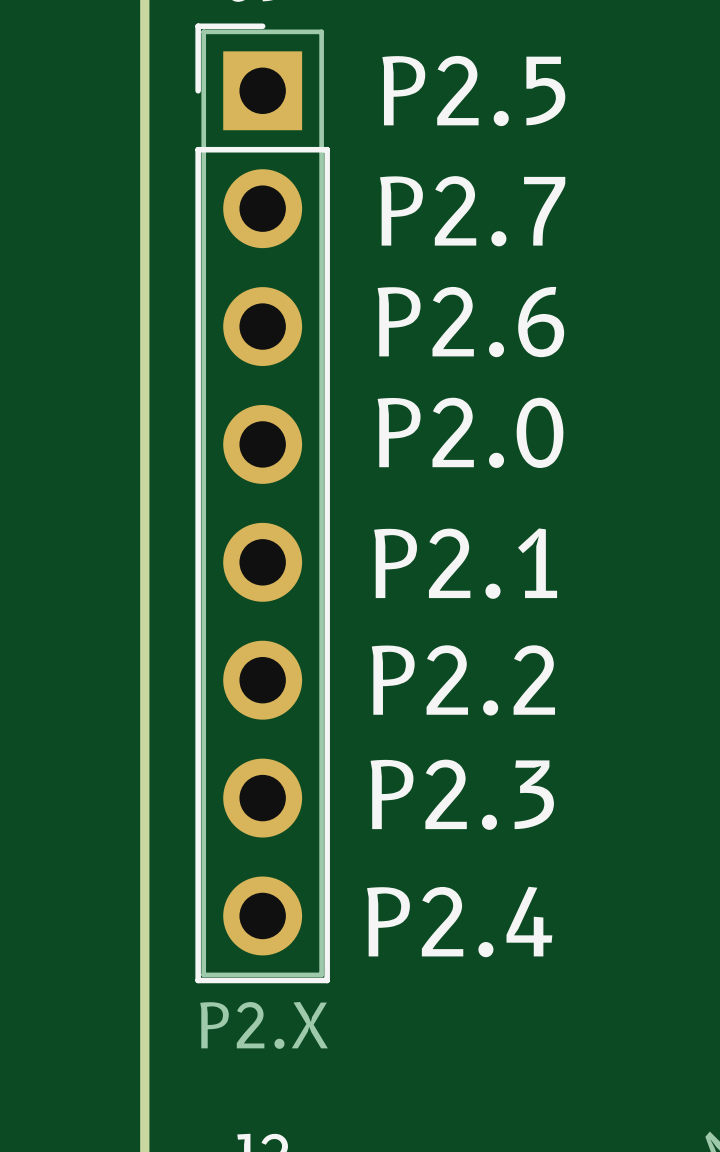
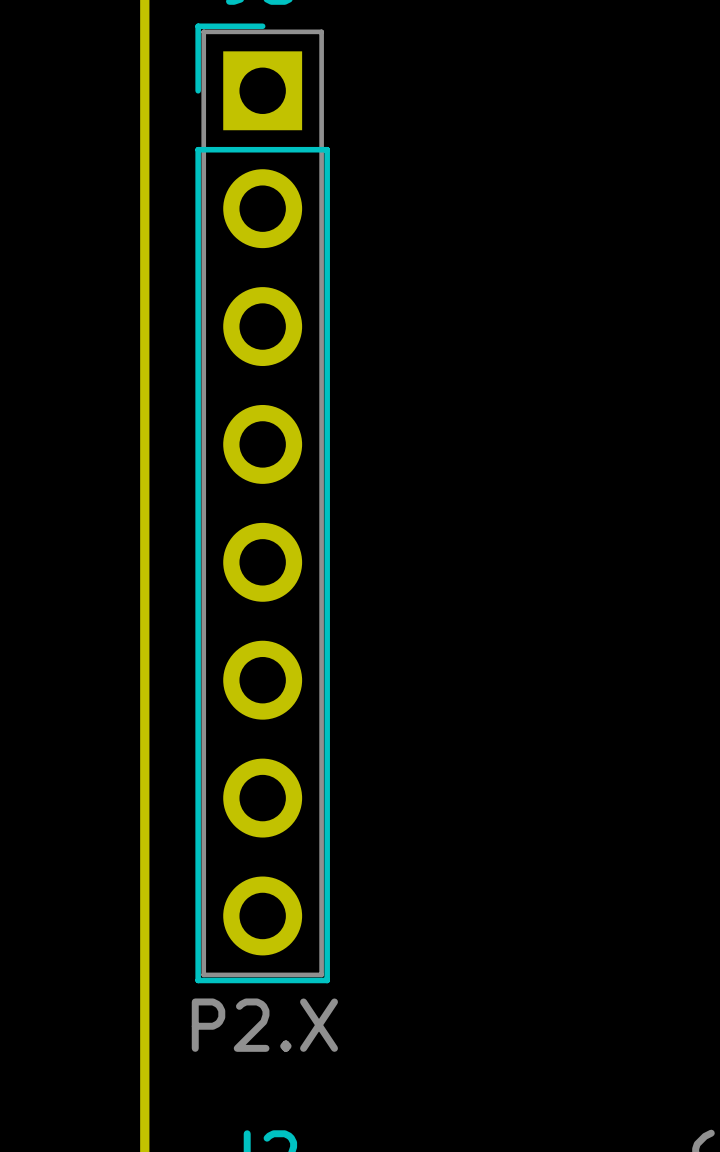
text: P2.5 (473, 91) -> none
text: P2.7 (472, 211) -> none
text: P2.6 (470, 322) -> none
text: P2.0 (470, 432) -> none
text: P2.1 (465, 563) -> none
text: P2.2 (463, 680) -> none
text: P2.3 (462, 794) -> none
text: P2.4 (459, 922) -> none

